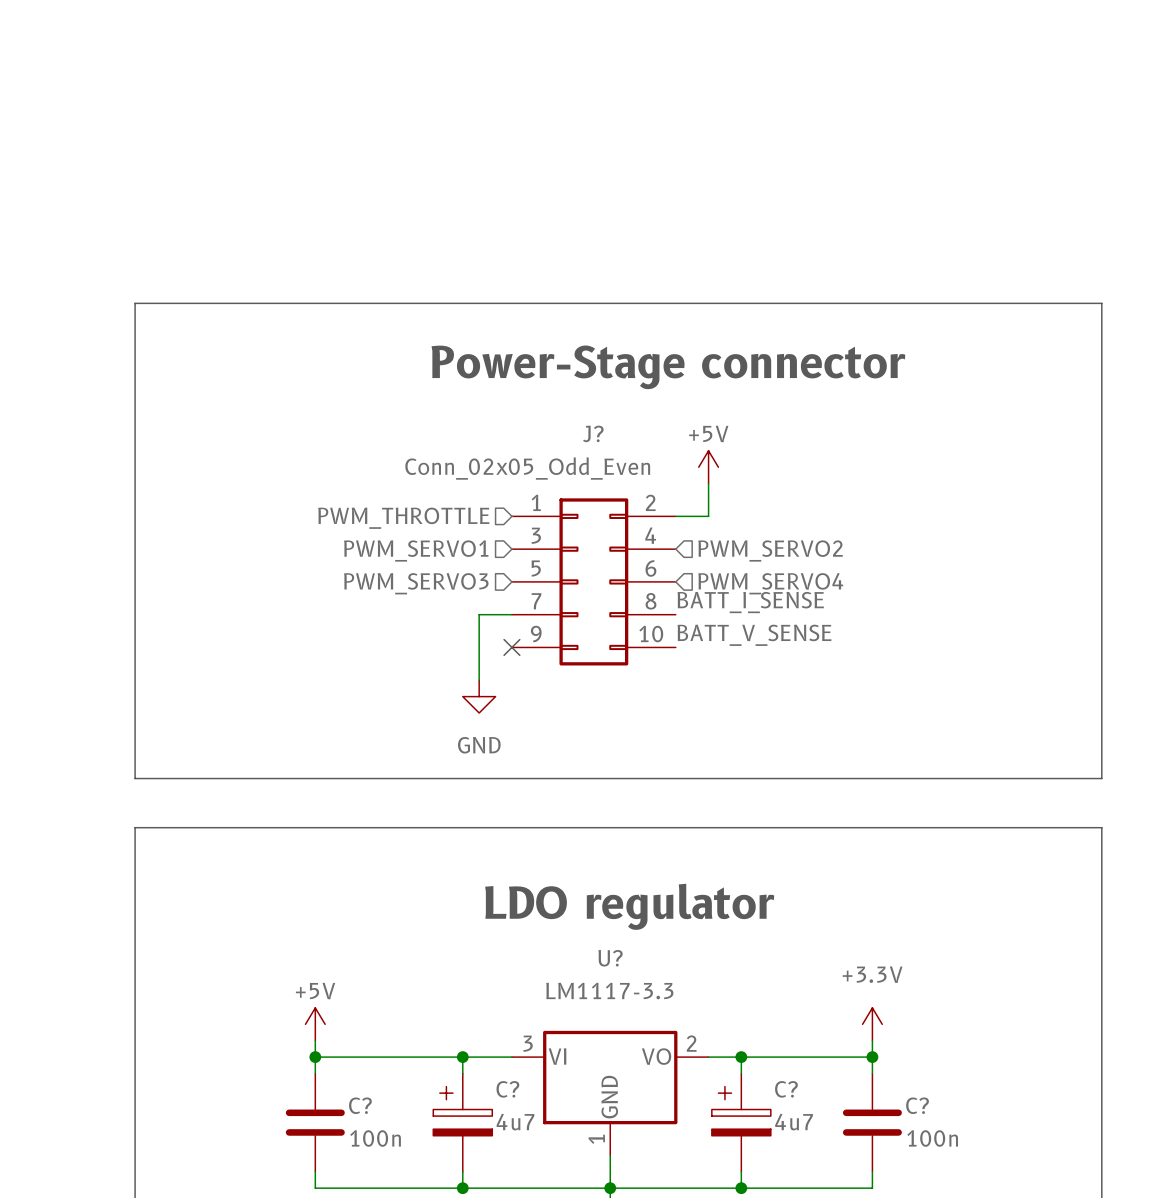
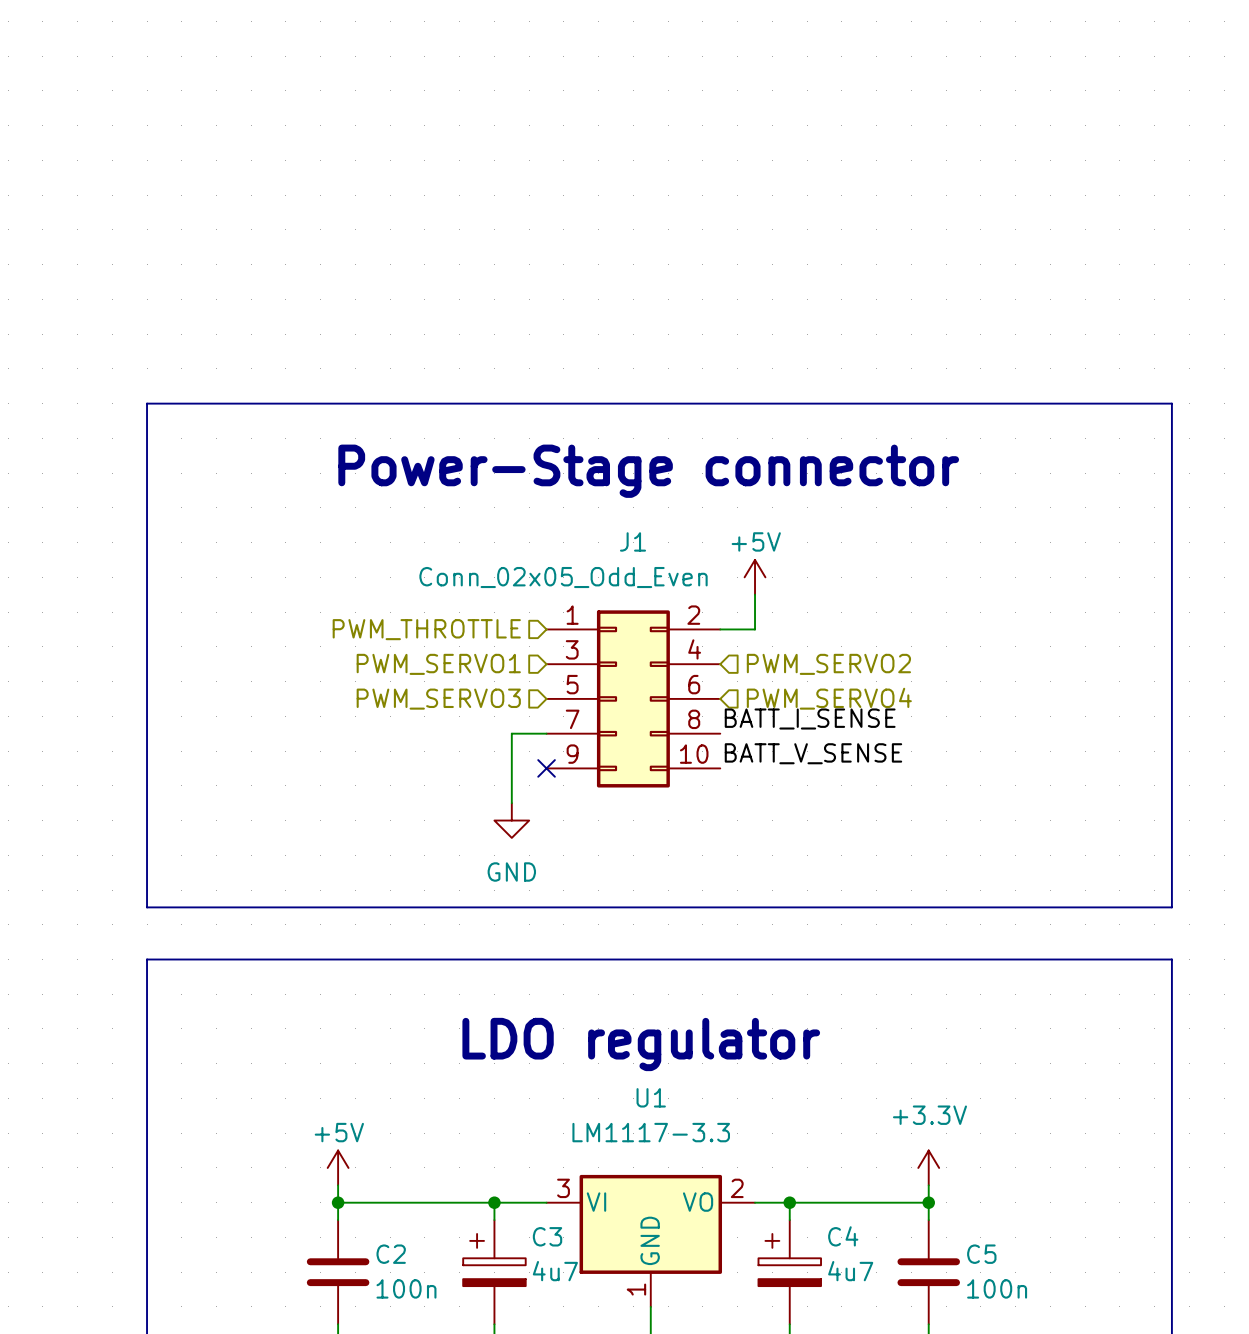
J? name: J? (593, 433) -> J1 (633, 541)
U? name: U? (610, 958) -> U1 (651, 1097)
C? name: C? (507, 1089) -> C3 (547, 1236)
C? name: C? (786, 1089) -> C4 (843, 1236)
C? name: C? (360, 1105) -> C2 (391, 1254)
C? name: C? (917, 1105) -> C5 (981, 1254)

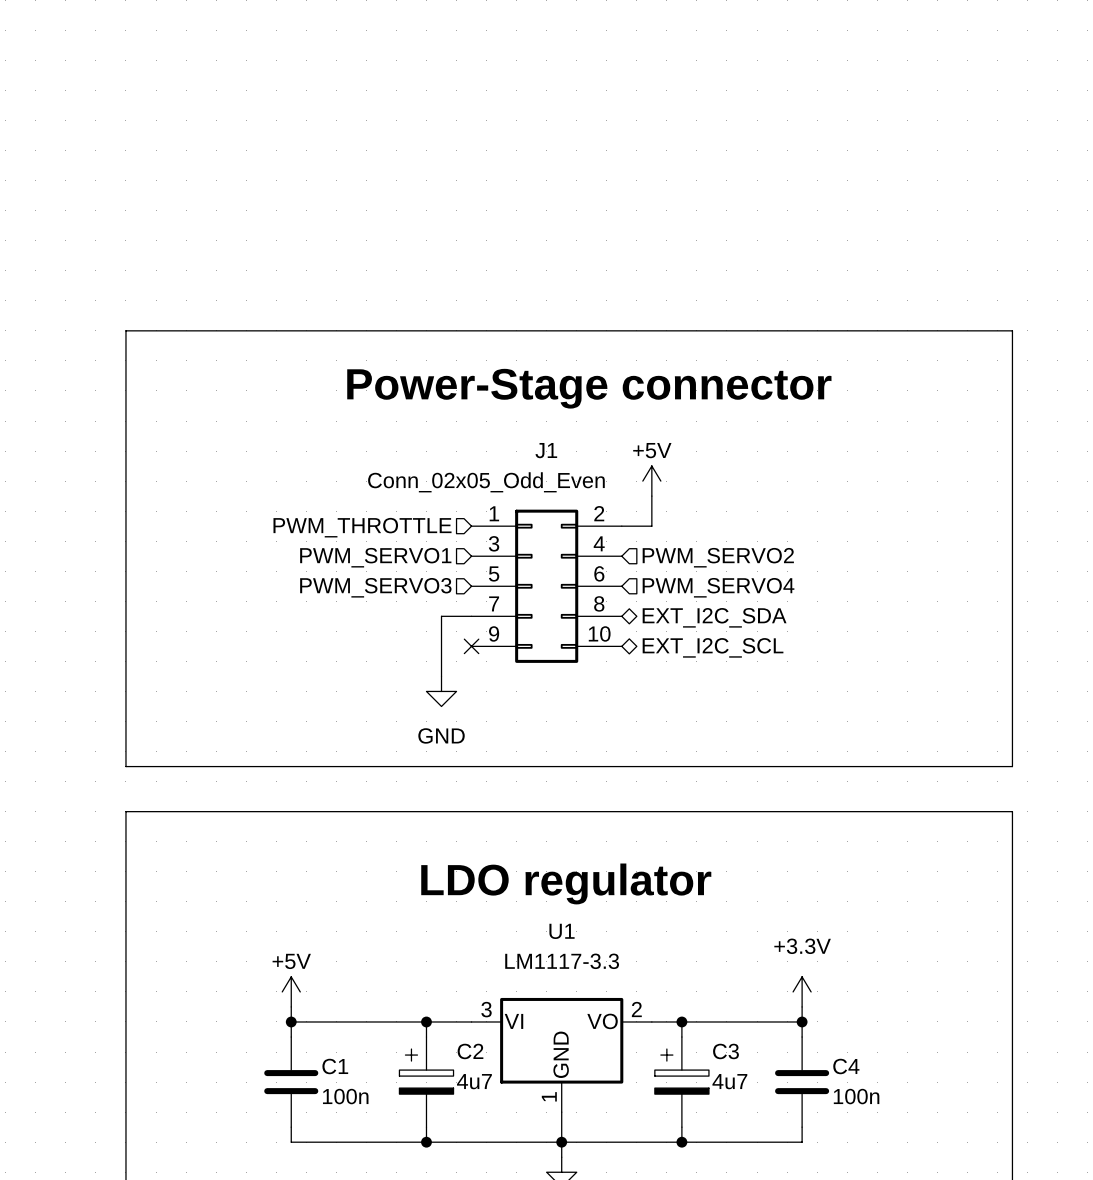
label: BATT_I_SENSE (810, 719) -> none
hierarchical label: none -> EXT_I2C_SDA (714, 617)
label: BATT_V_SENSE (813, 753) -> none
hierarchical label: none -> EXT_I2C_SCL (713, 647)
C3 name: C3 (547, 1236) -> C2 (470, 1051)
C4 name: C4 (843, 1236) -> C3 (725, 1051)
C2 name: C2 (391, 1254) -> C1 (335, 1066)
C5 name: C5 (981, 1254) -> C4 (846, 1066)

